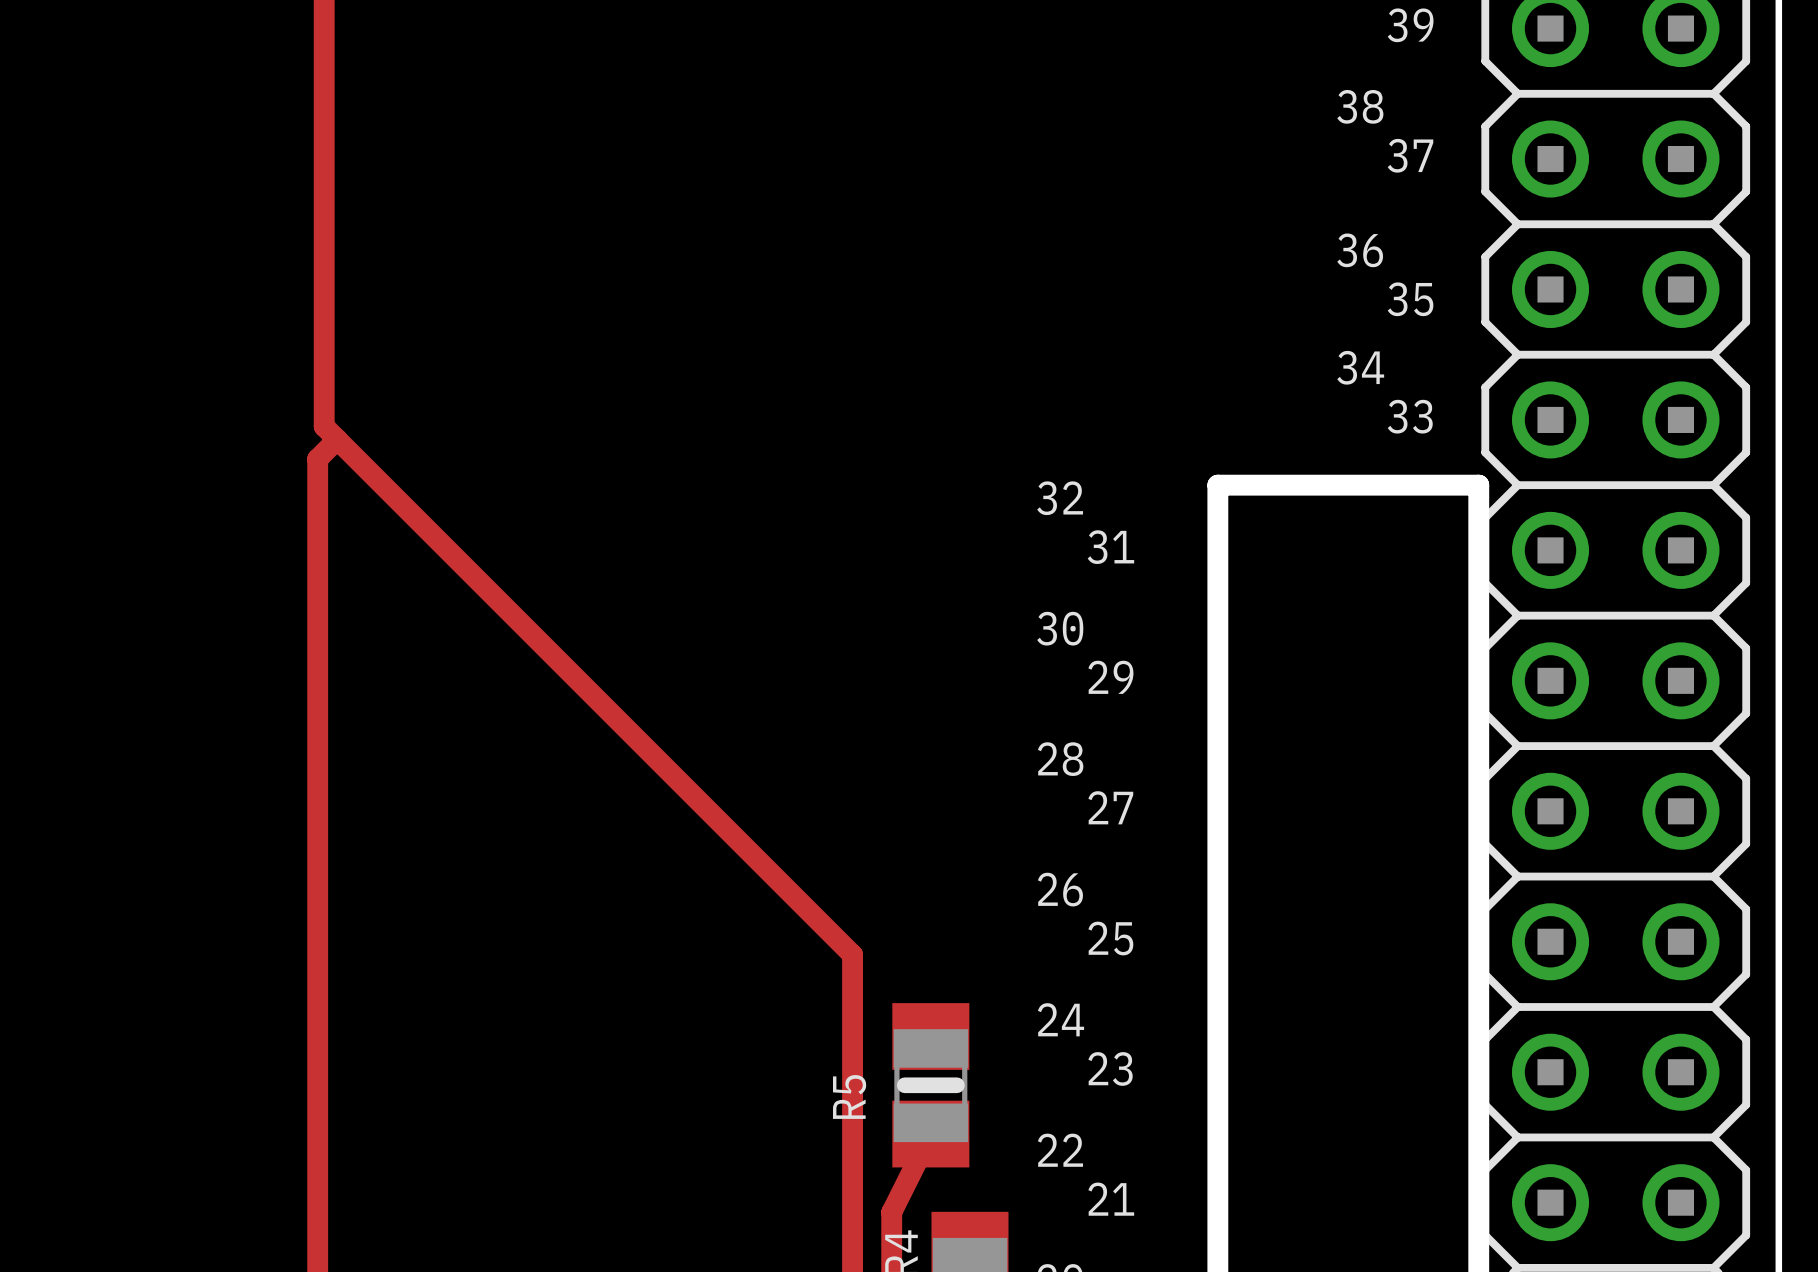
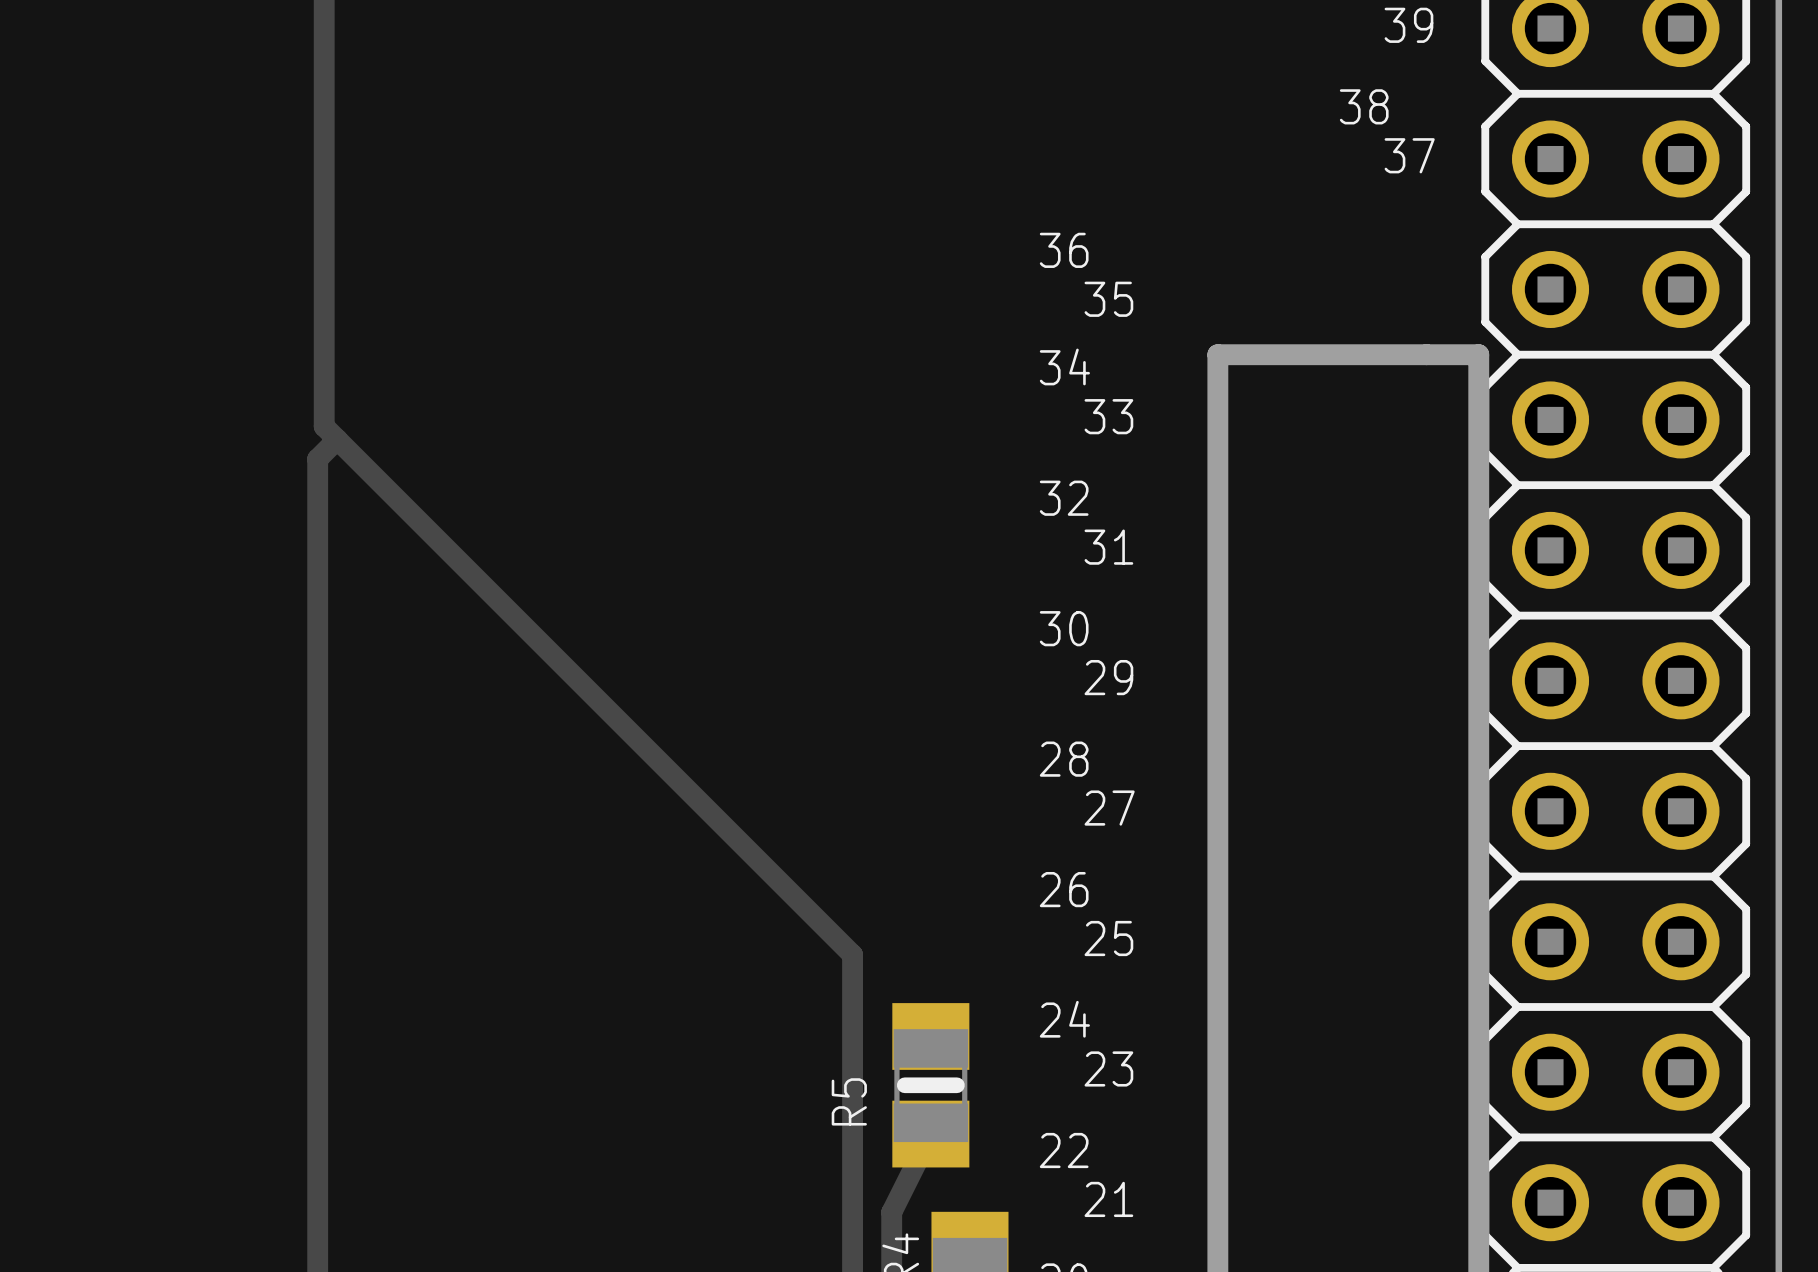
text position: 36 (1360, 250) -> 36 (1064, 250)
text position: 35 (1410, 299) -> 35 (1108, 299)
text position: 34 (1360, 367) -> 34 (1064, 366)
text position: 33 (1410, 416) -> 33 (1108, 416)
board edge: (1217, 485) (1478, 485) -> (1217, 485) (1217, 354) (1478, 354) (1478, 485)

